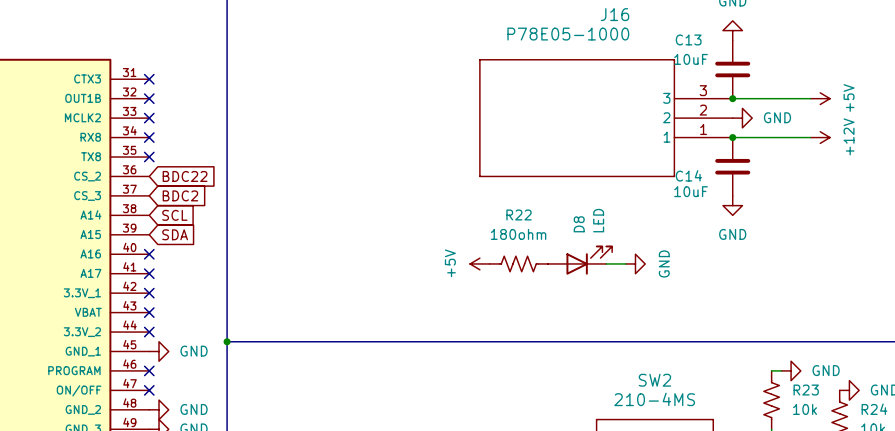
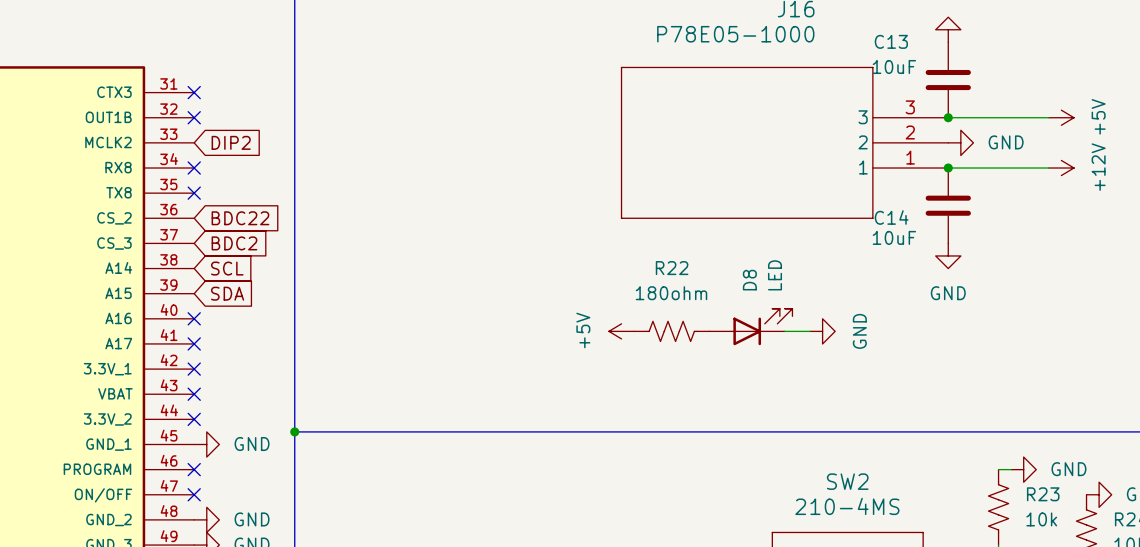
no-connect mark: (149, 118) -> none
global label: none -> DIP2 (231, 142)

